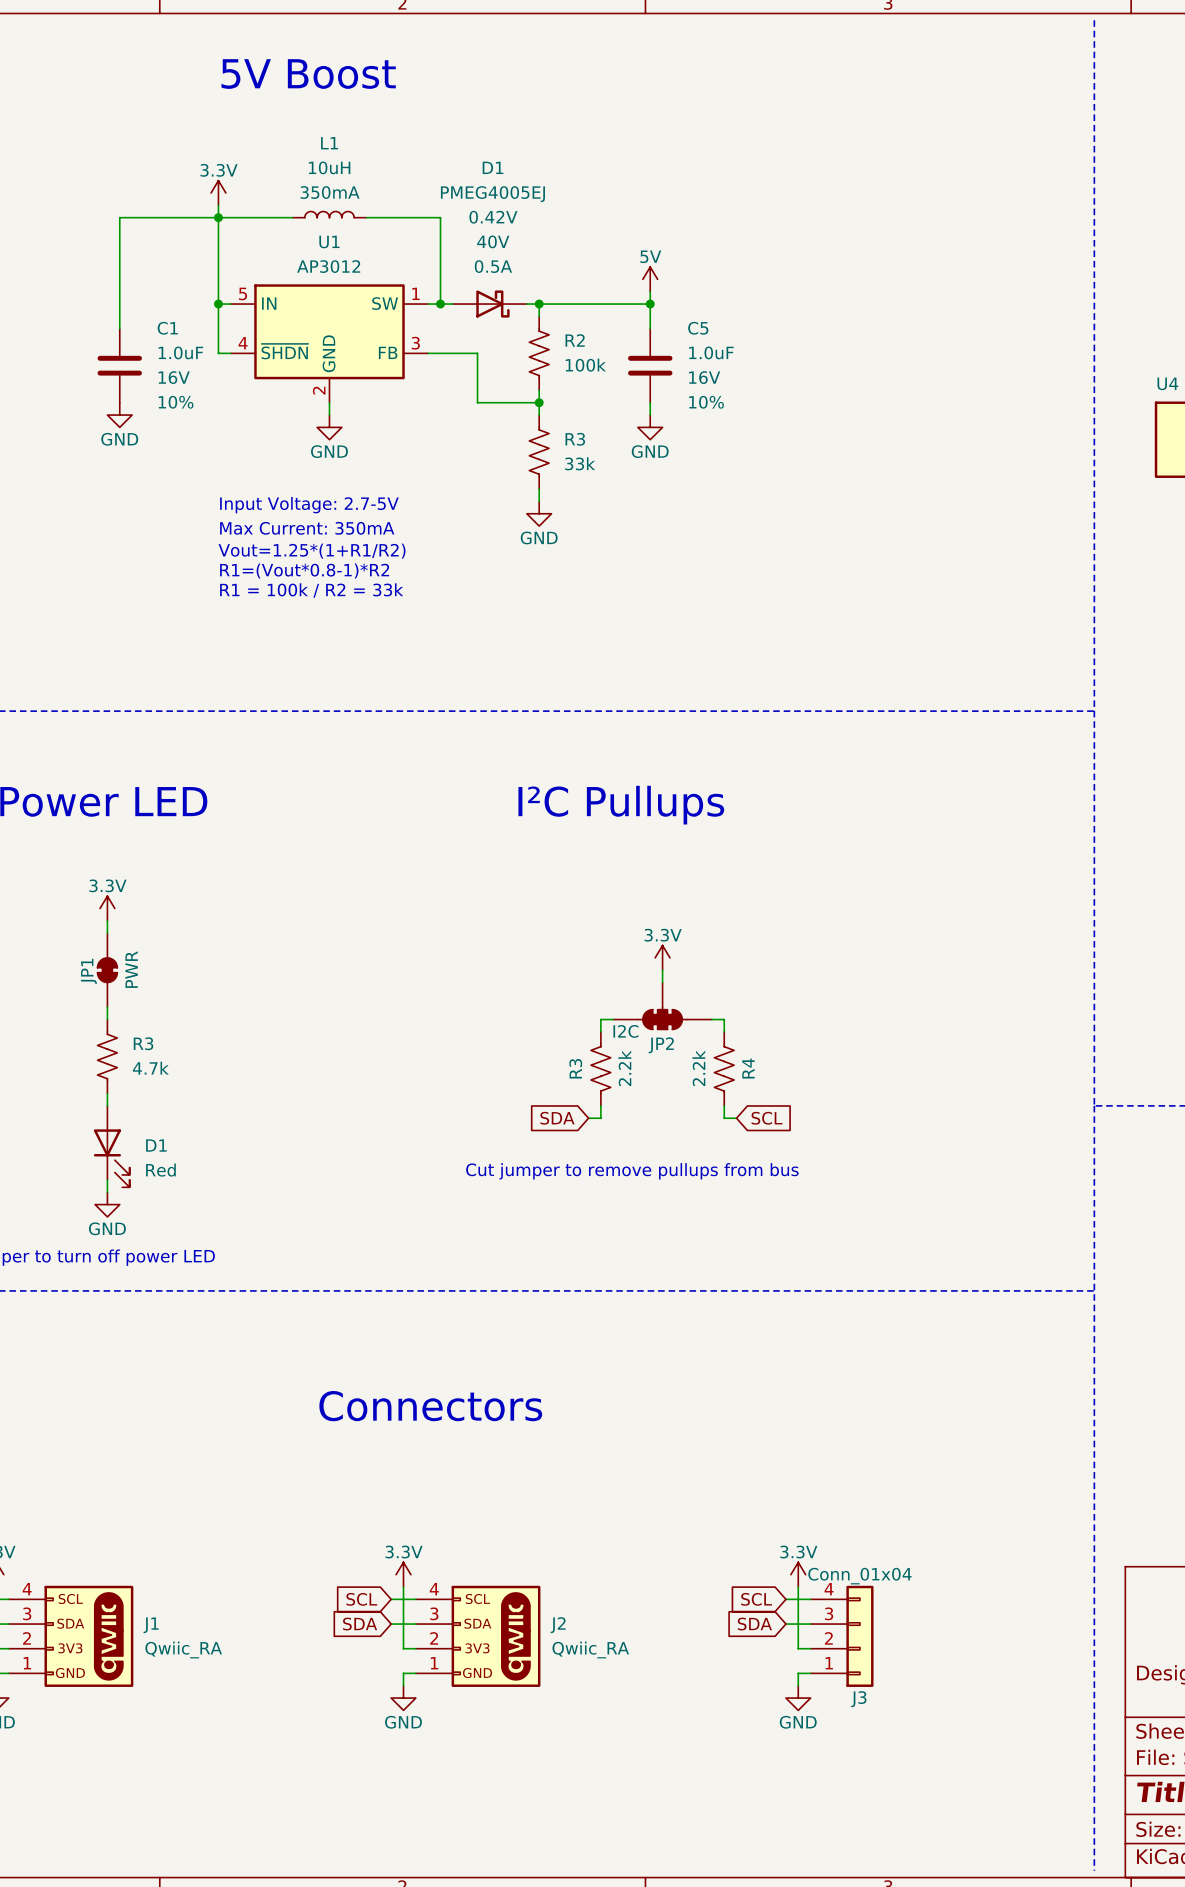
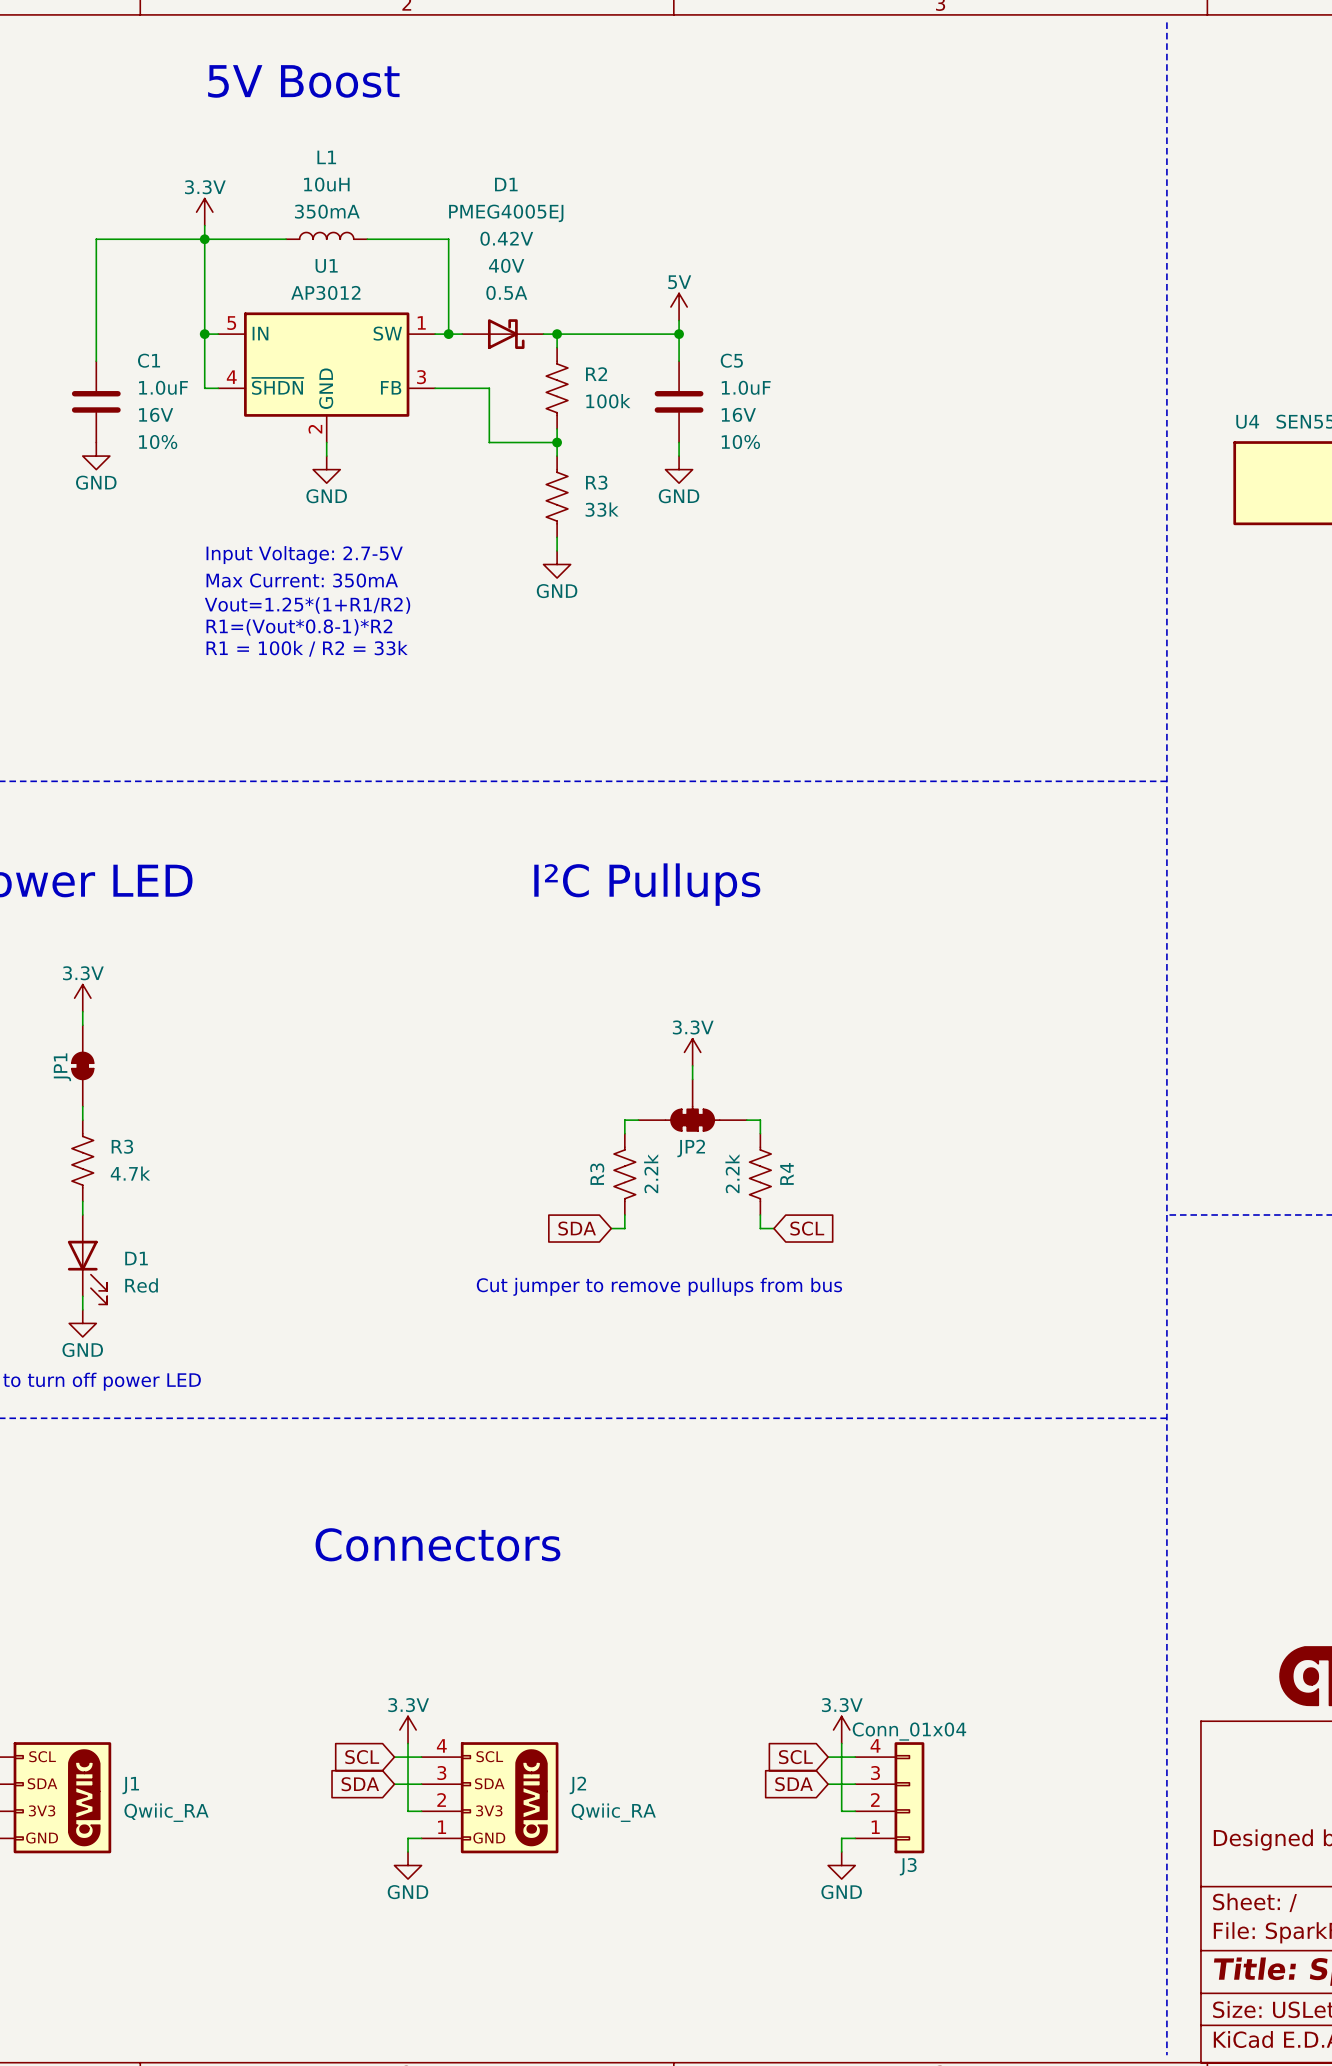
JP1 value: PWR (131, 969) -> none
JP2 value: I2C (625, 1031) -> none

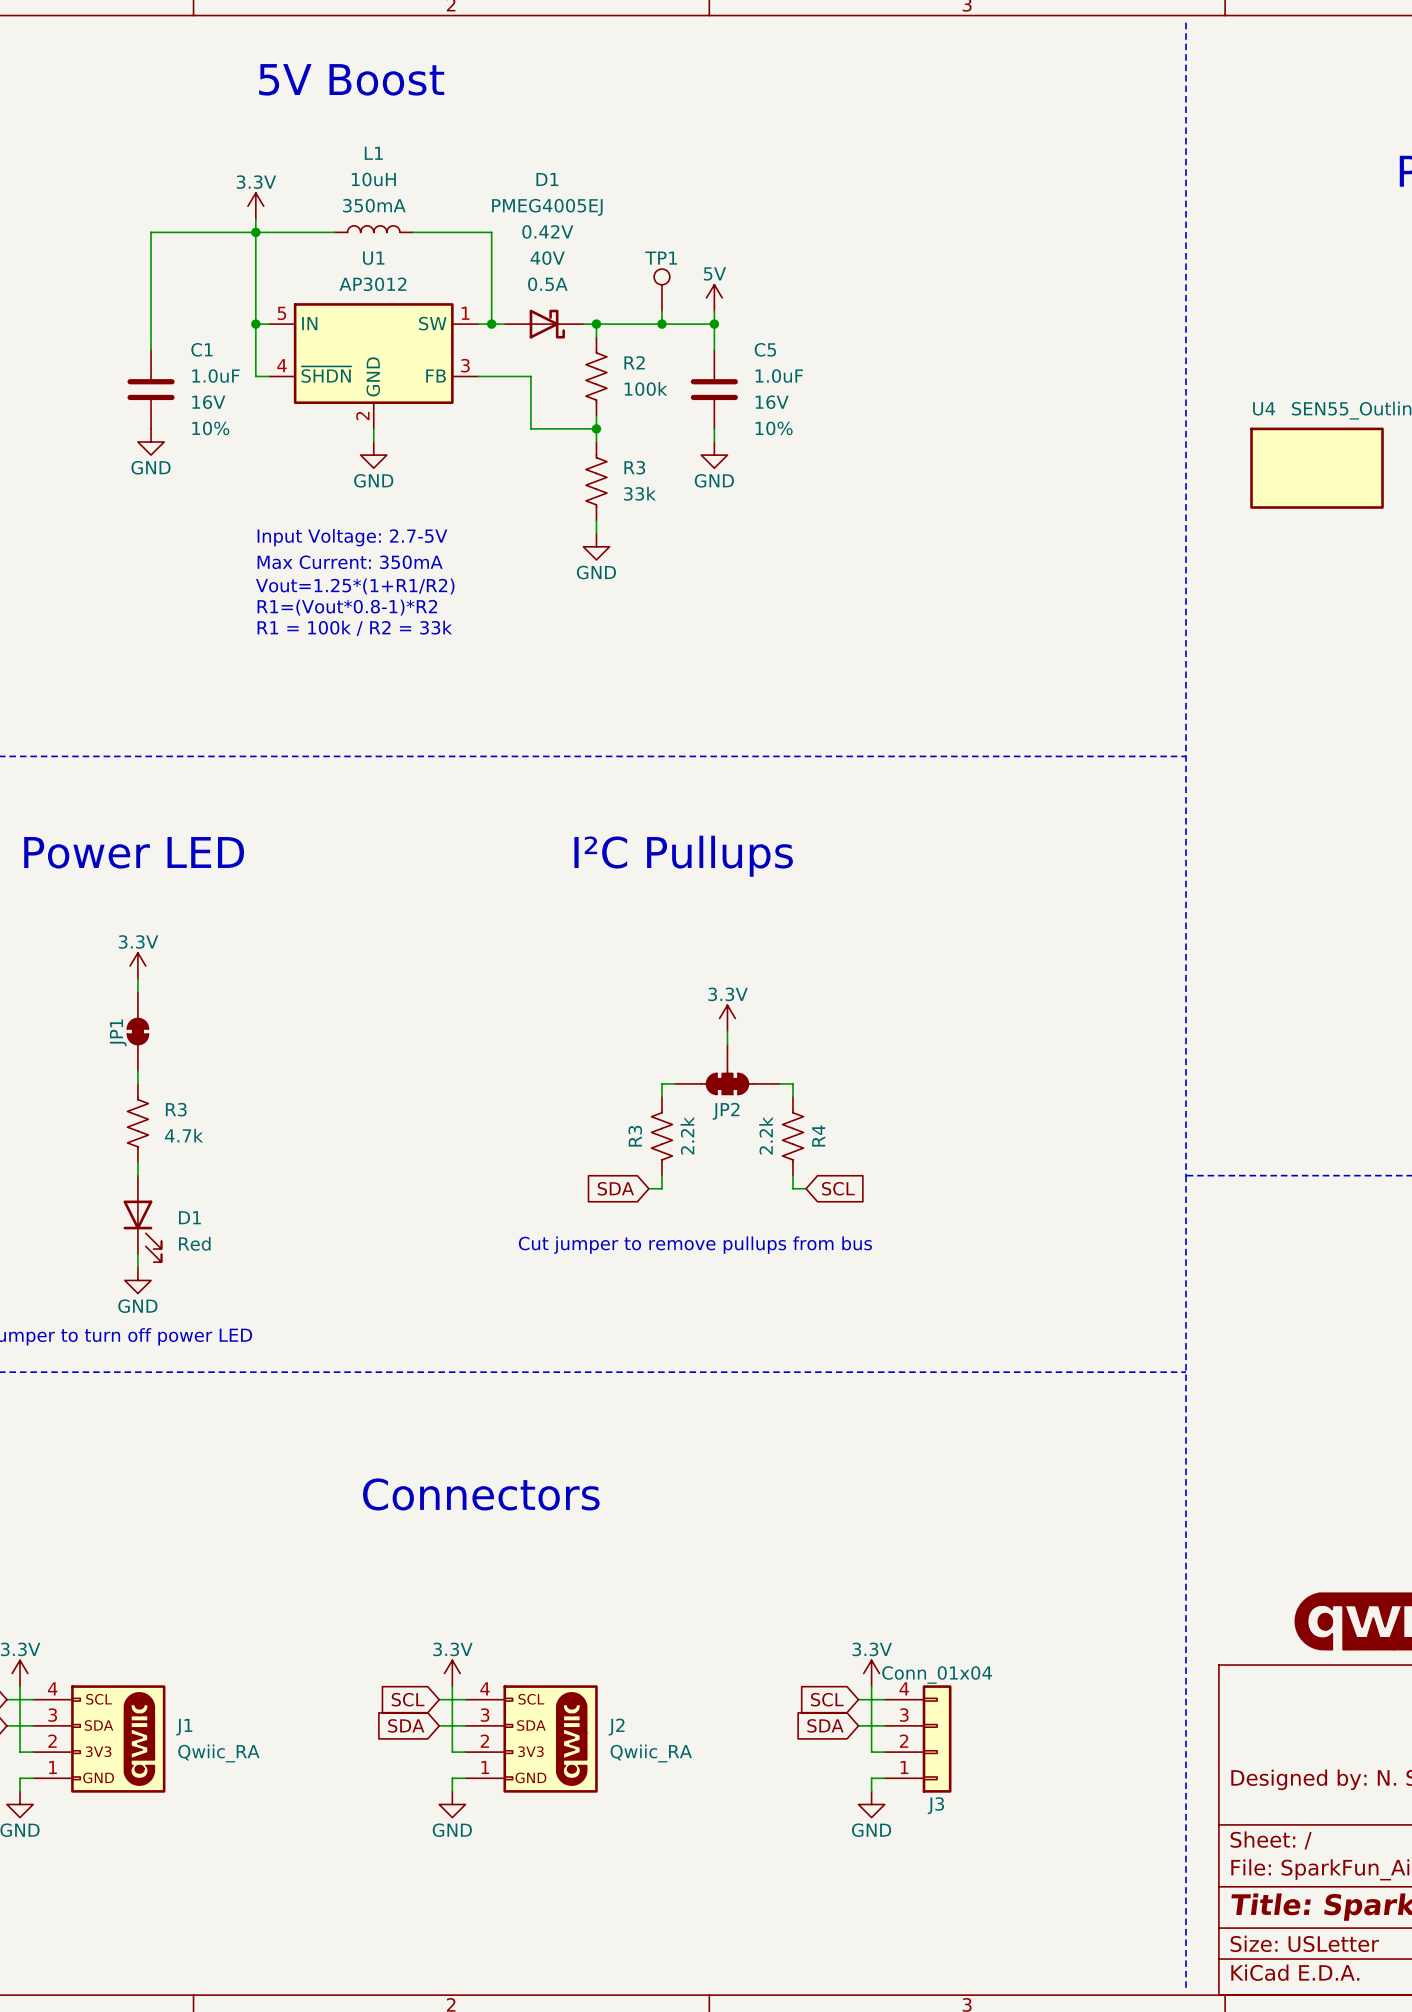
TP1: none -> (661, 290)
wire: none -> (661, 310) (661, 324)
junction: none -> (661, 324)

